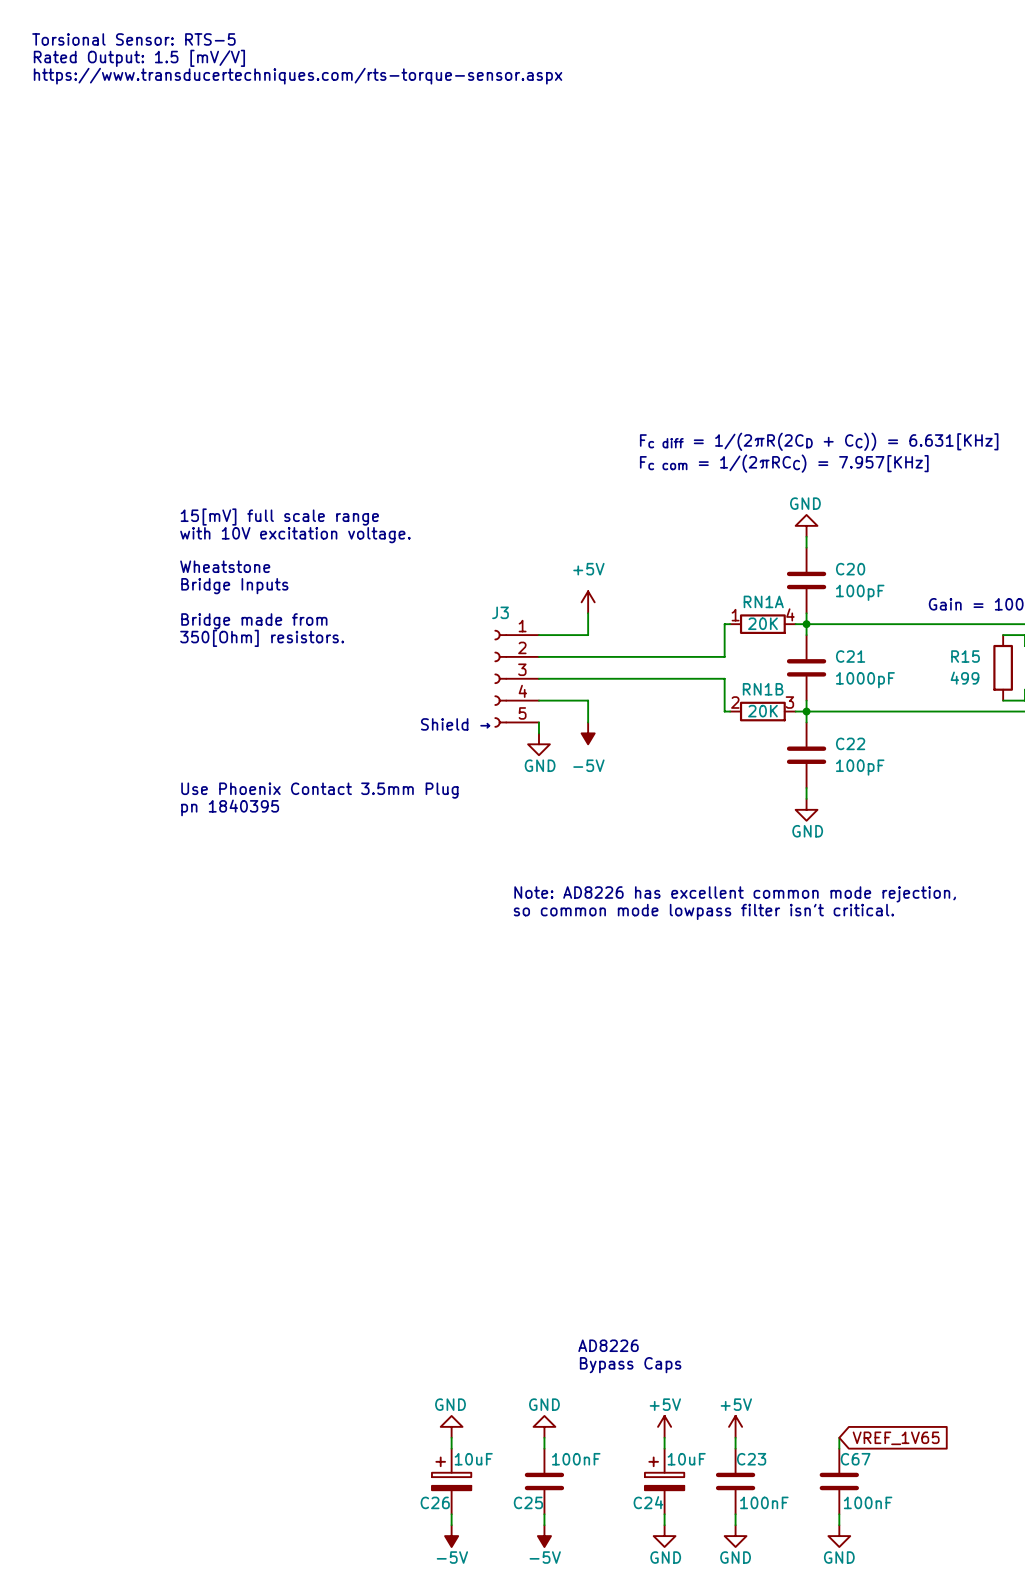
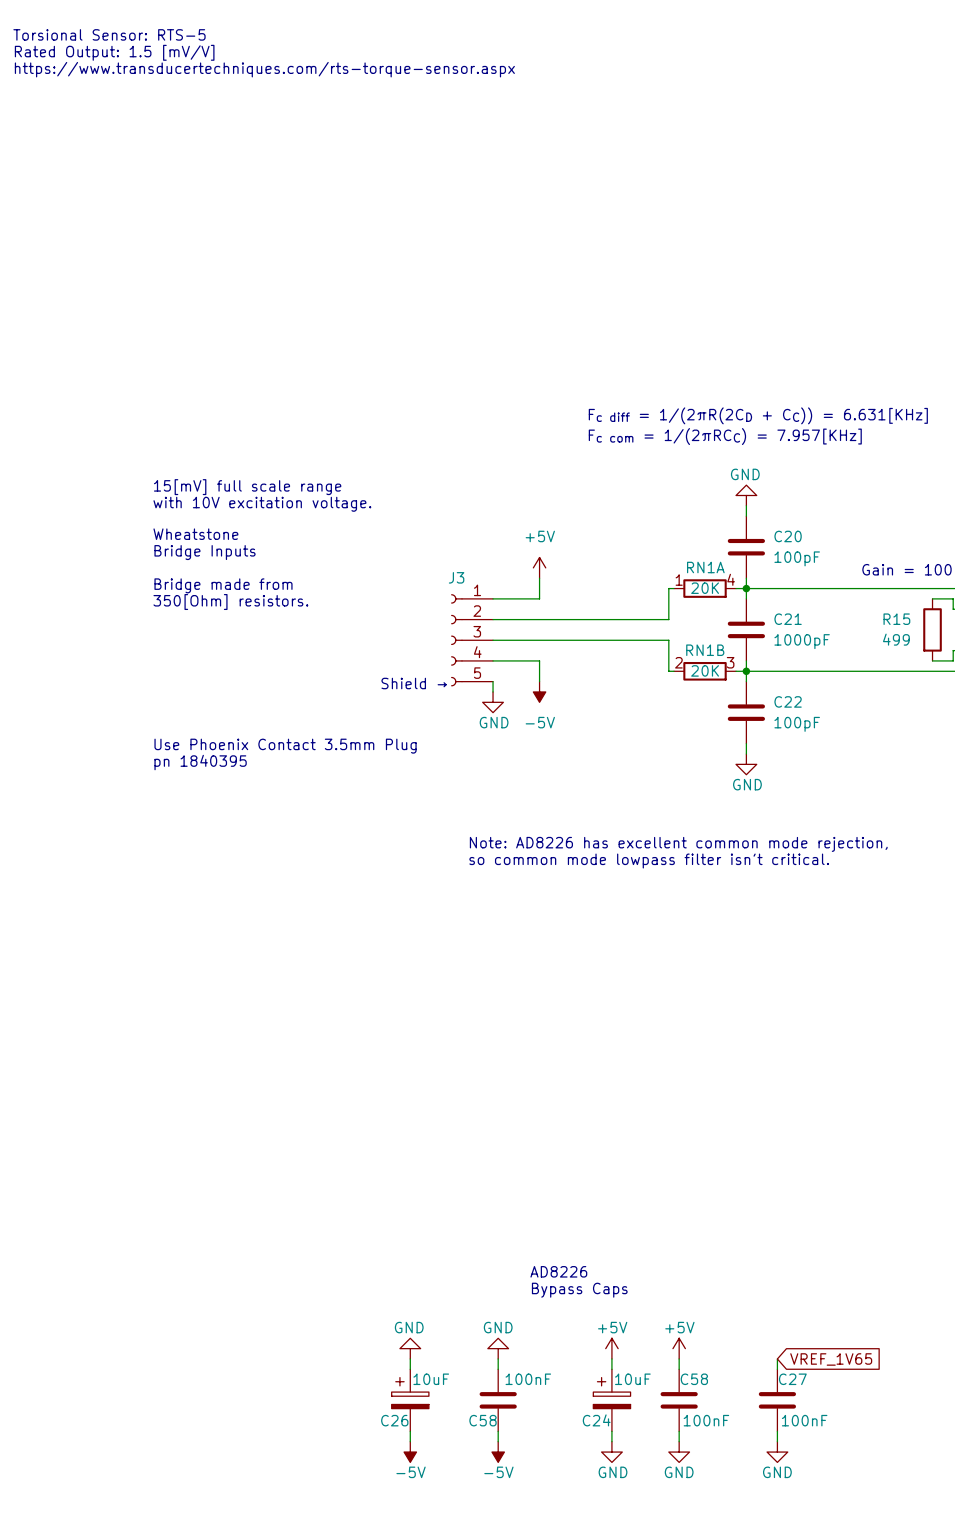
C23 name: C23 (751, 1459) -> C58 (694, 1379)
C67 name: C67 (855, 1459) -> C27 (792, 1379)
C25 name: C25 (528, 1502) -> C58 (483, 1420)

